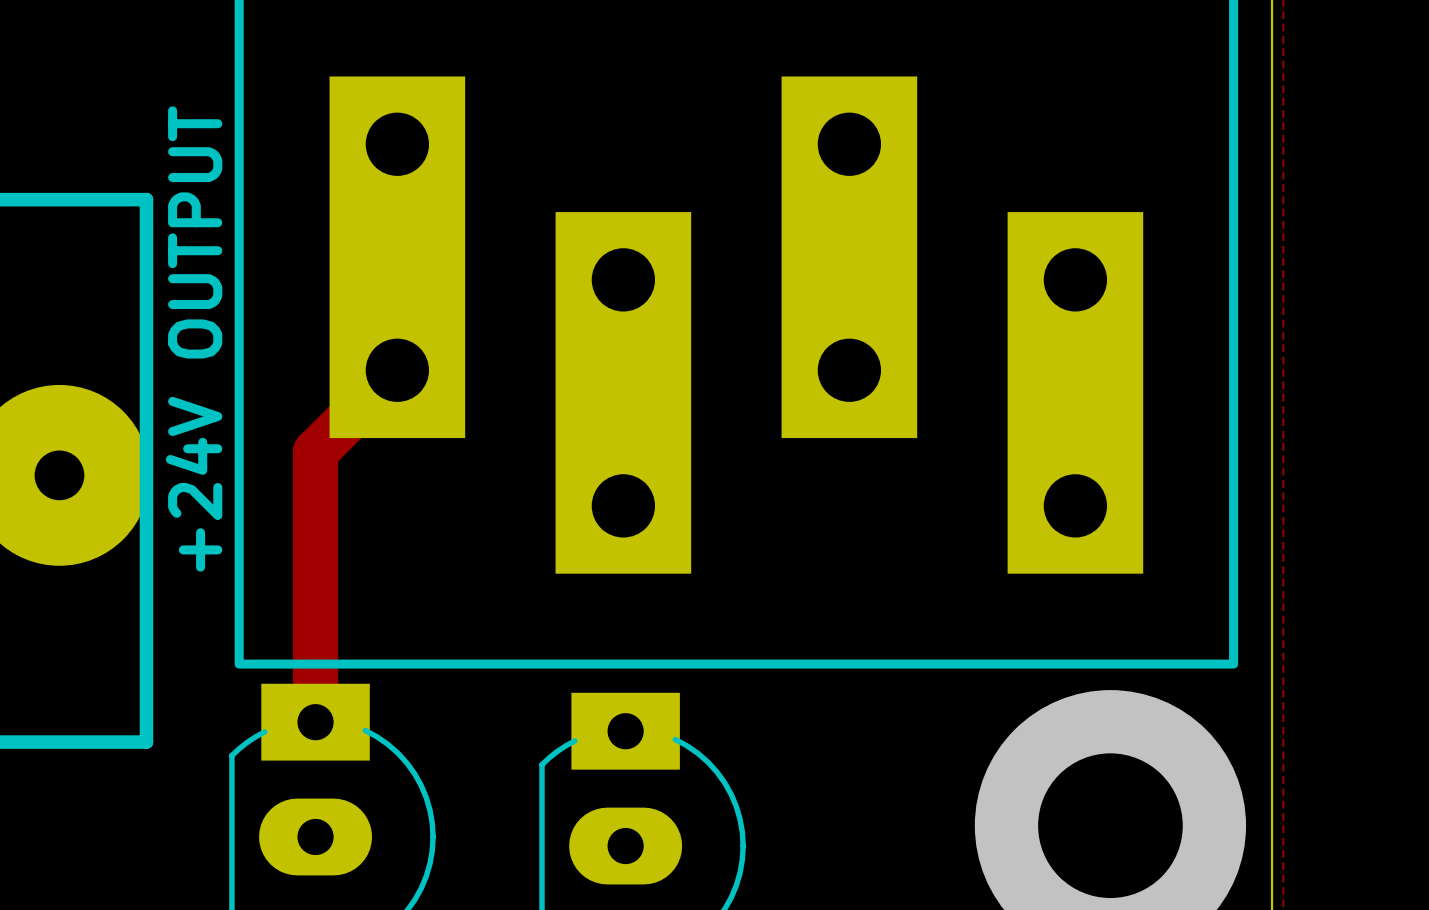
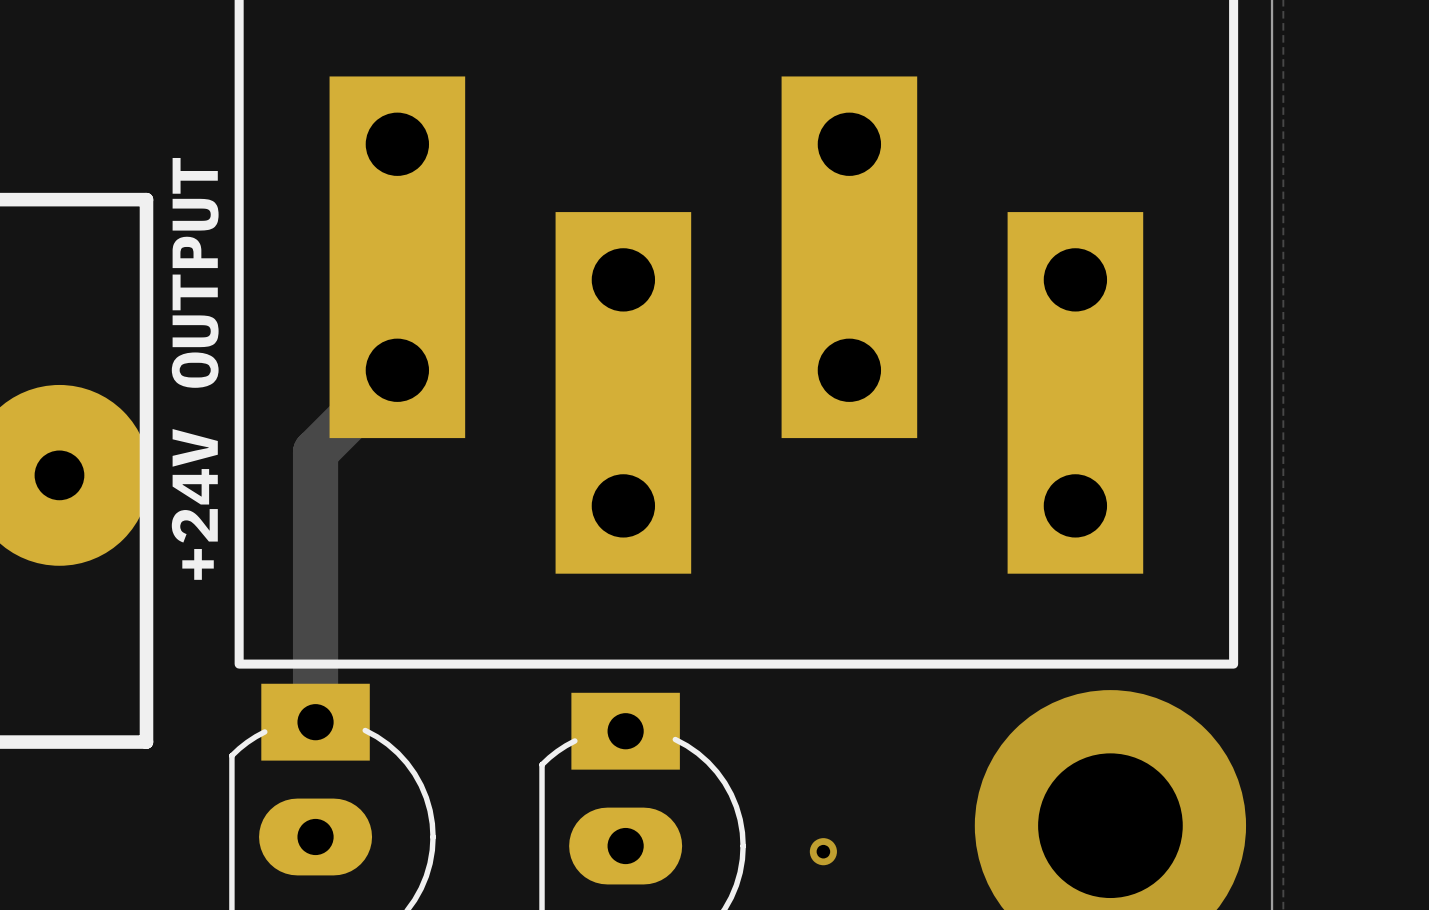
via: none -> (823, 851)

